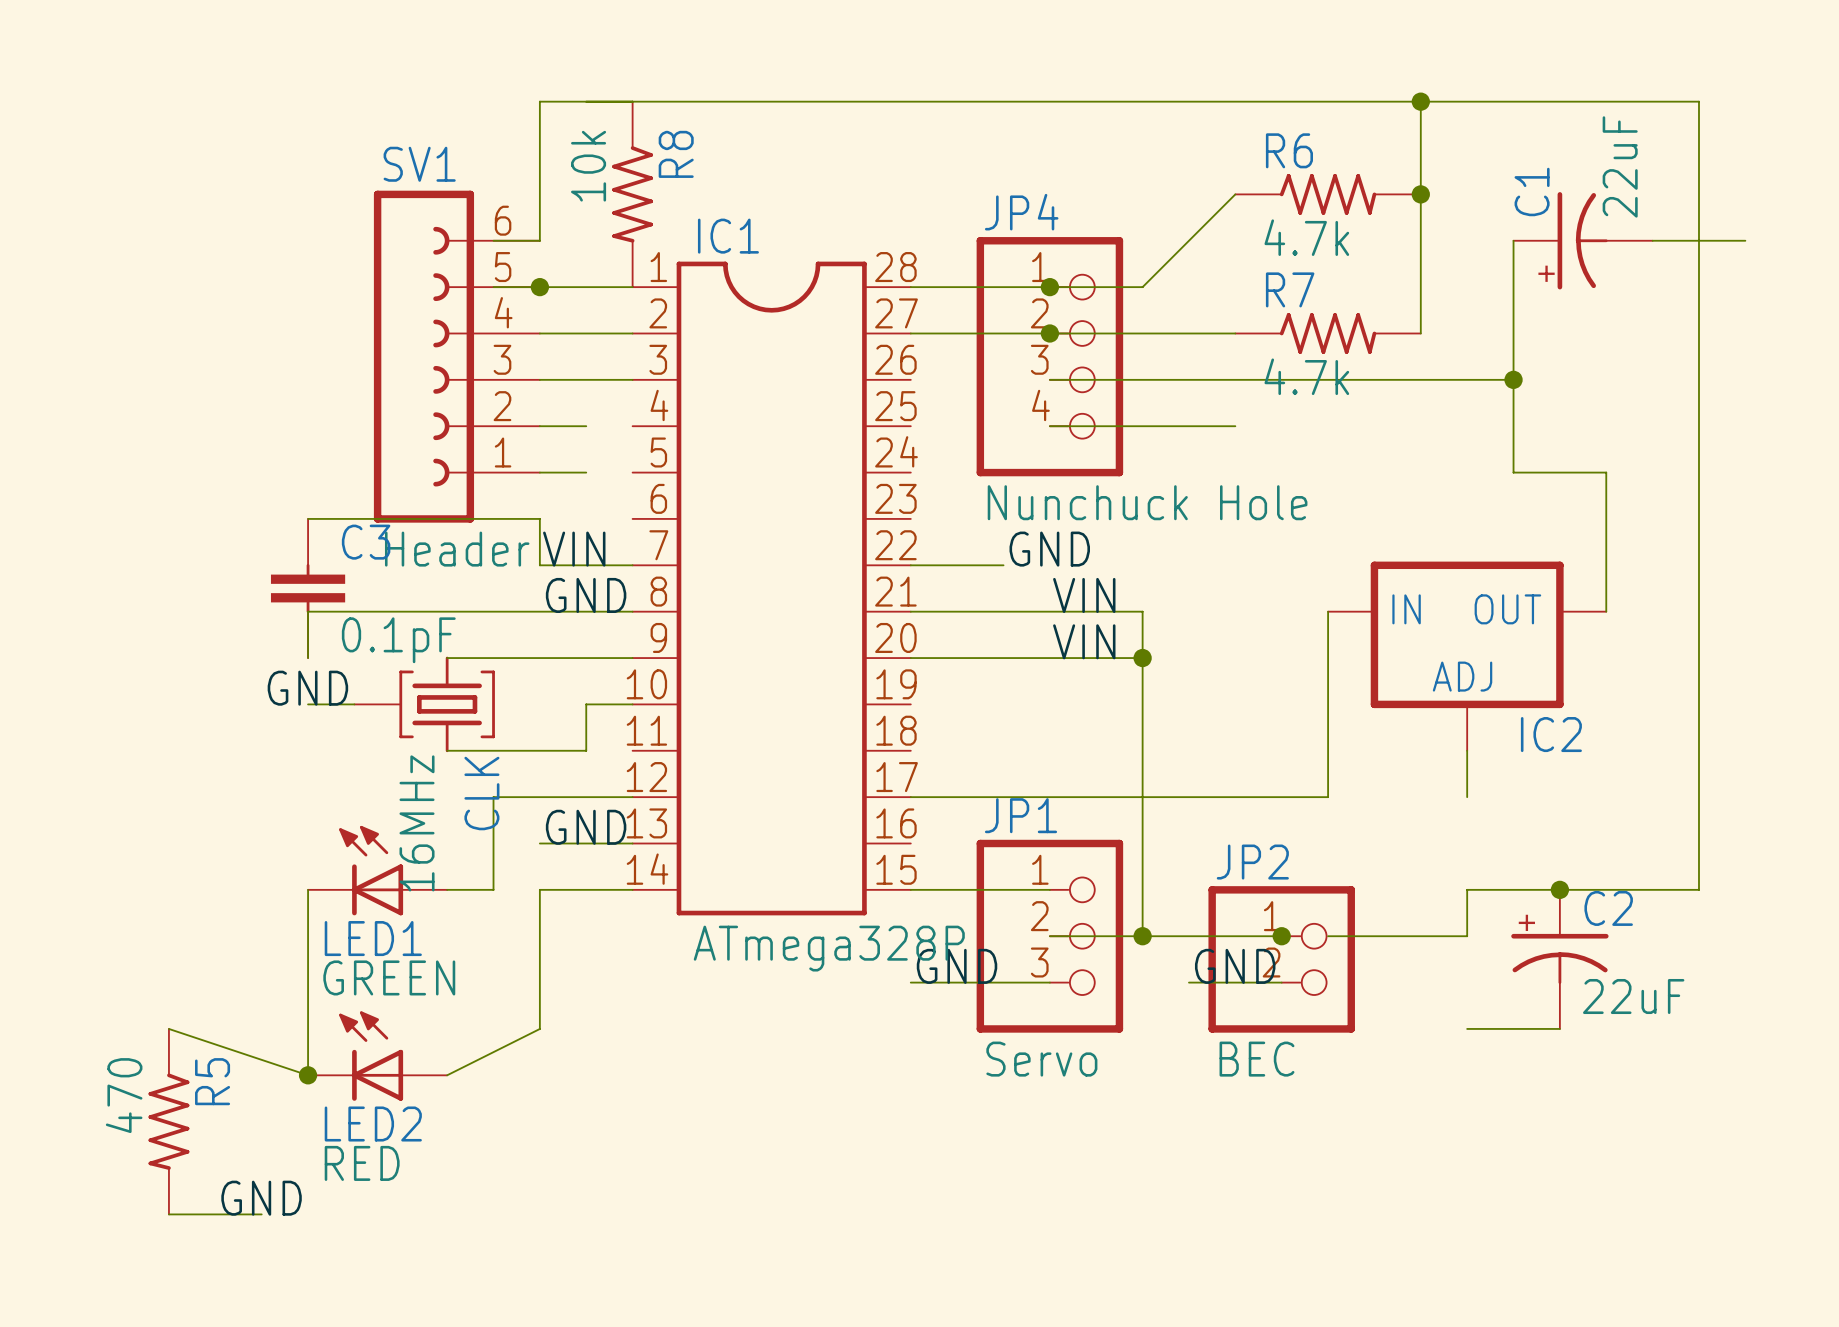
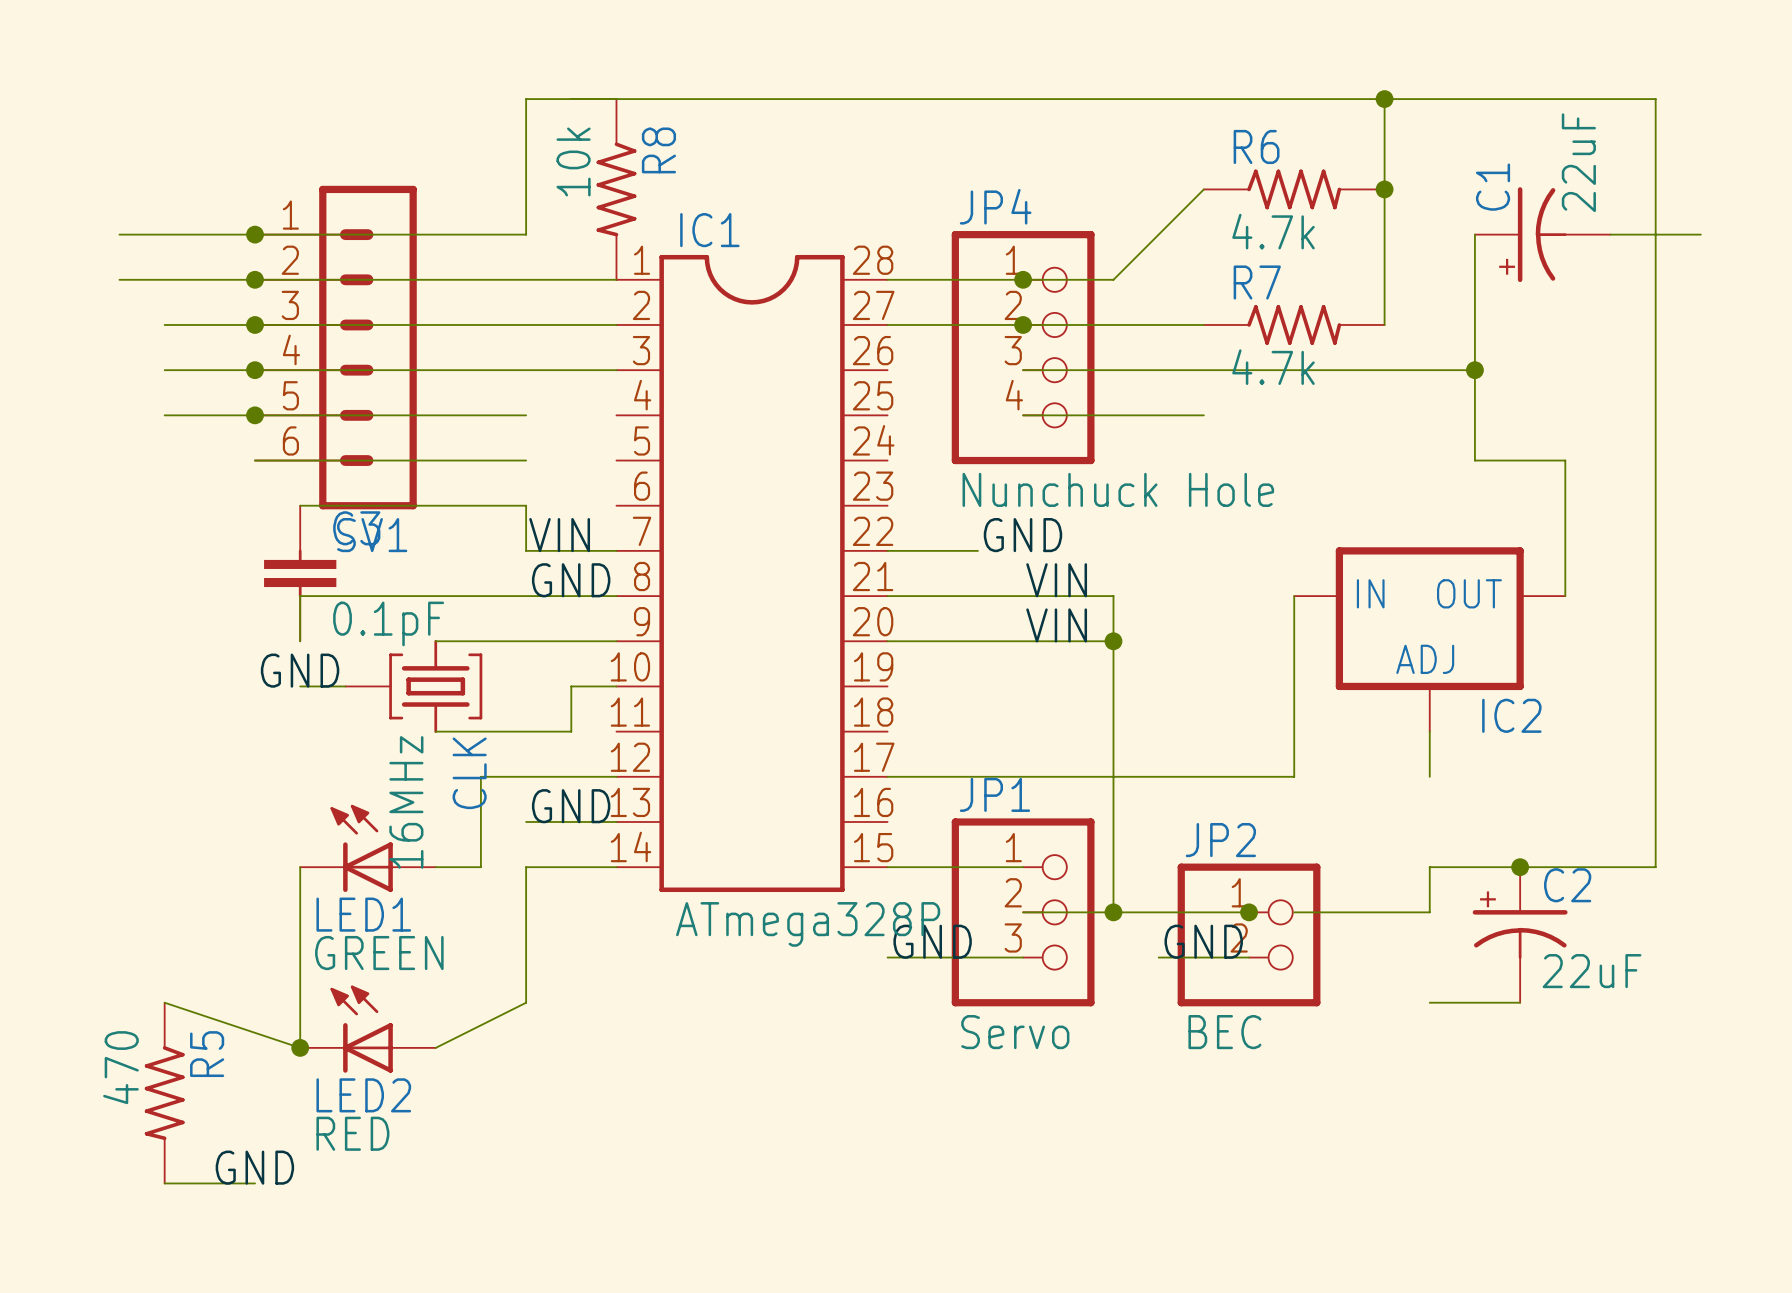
SV1 name position: SV1 (419, 164) -> SV1 (372, 535)
SV1 symbol: [373, 190, 540, 523] -> [255, 185, 417, 510]
wire: none -> (119, 234) (480, 234)
junction: none -> (255, 234)
wire: none -> (119, 279) (480, 279)
junction: none -> (255, 279)
junction: (539, 287) -> none
wire: none -> (164, 324) (526, 324)
junction: none -> (255, 324)
wire: none -> (164, 370) (526, 370)
junction: none -> (255, 370)
junction: none -> (255, 415)
wire: (539, 426) (586, 426) -> (526, 415) (164, 415)
wire: (539, 472) (586, 472) -> (526, 460) (255, 460)
SV1 value: Header (457, 549) -> none

